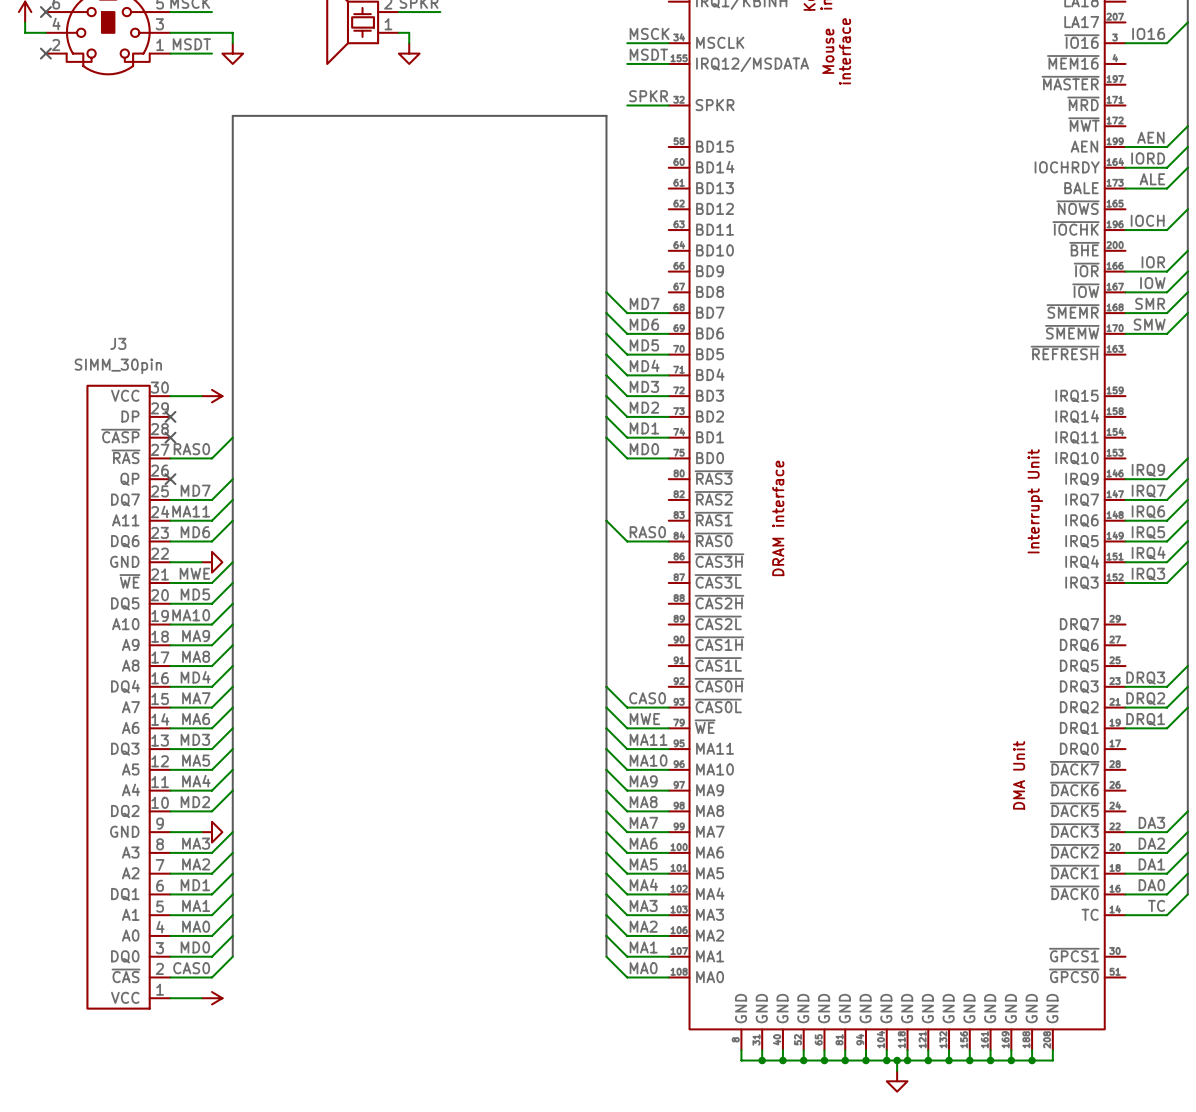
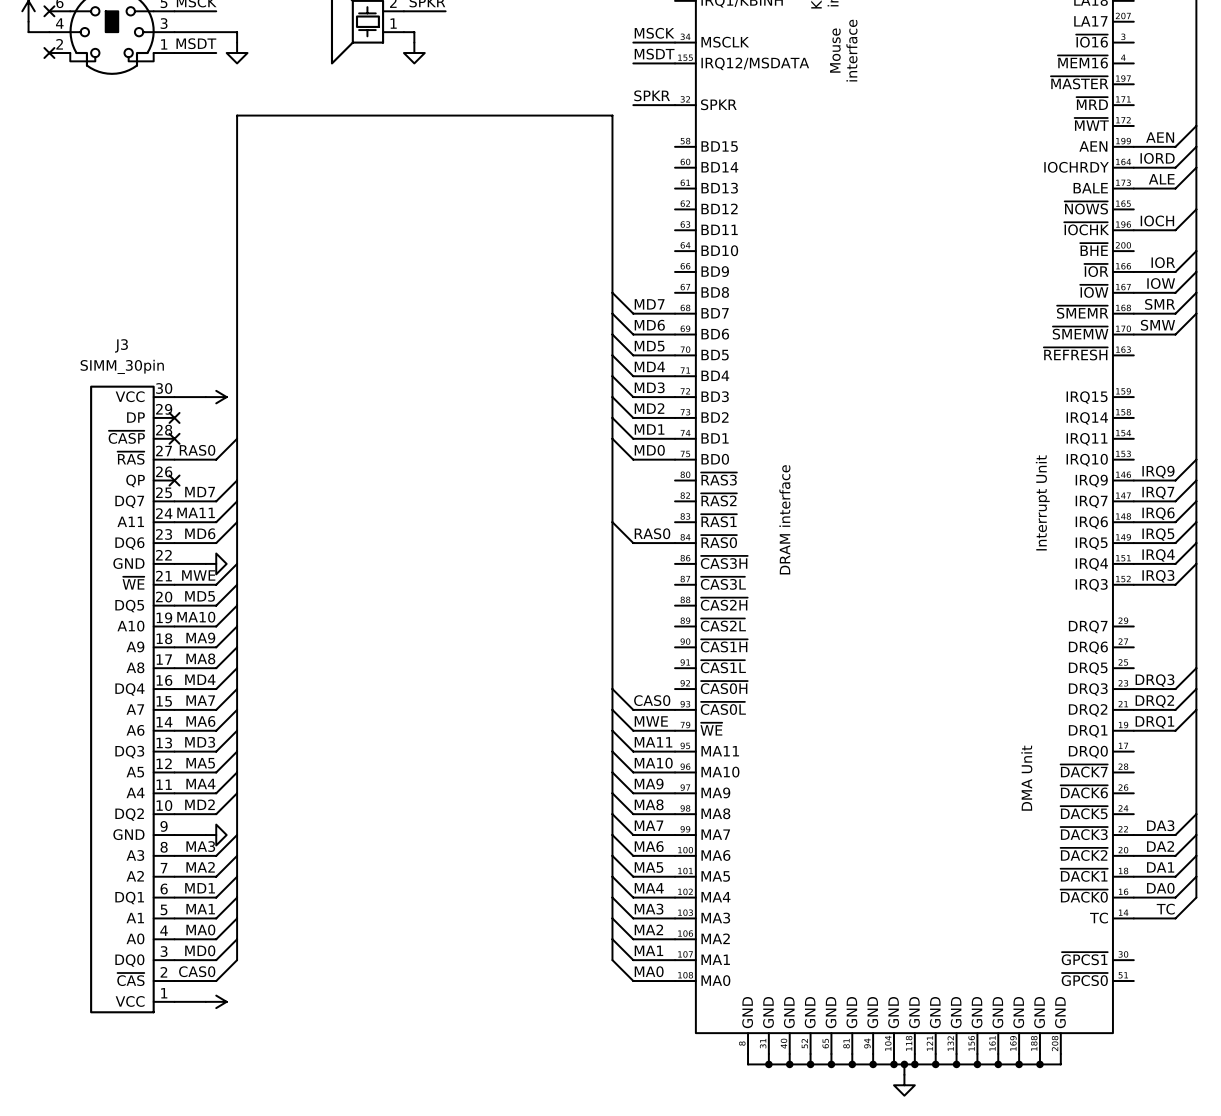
wire: (1187, 22) (1167, 43) (1125, 43) -> none
label: IO16 (1148, 33) -> none

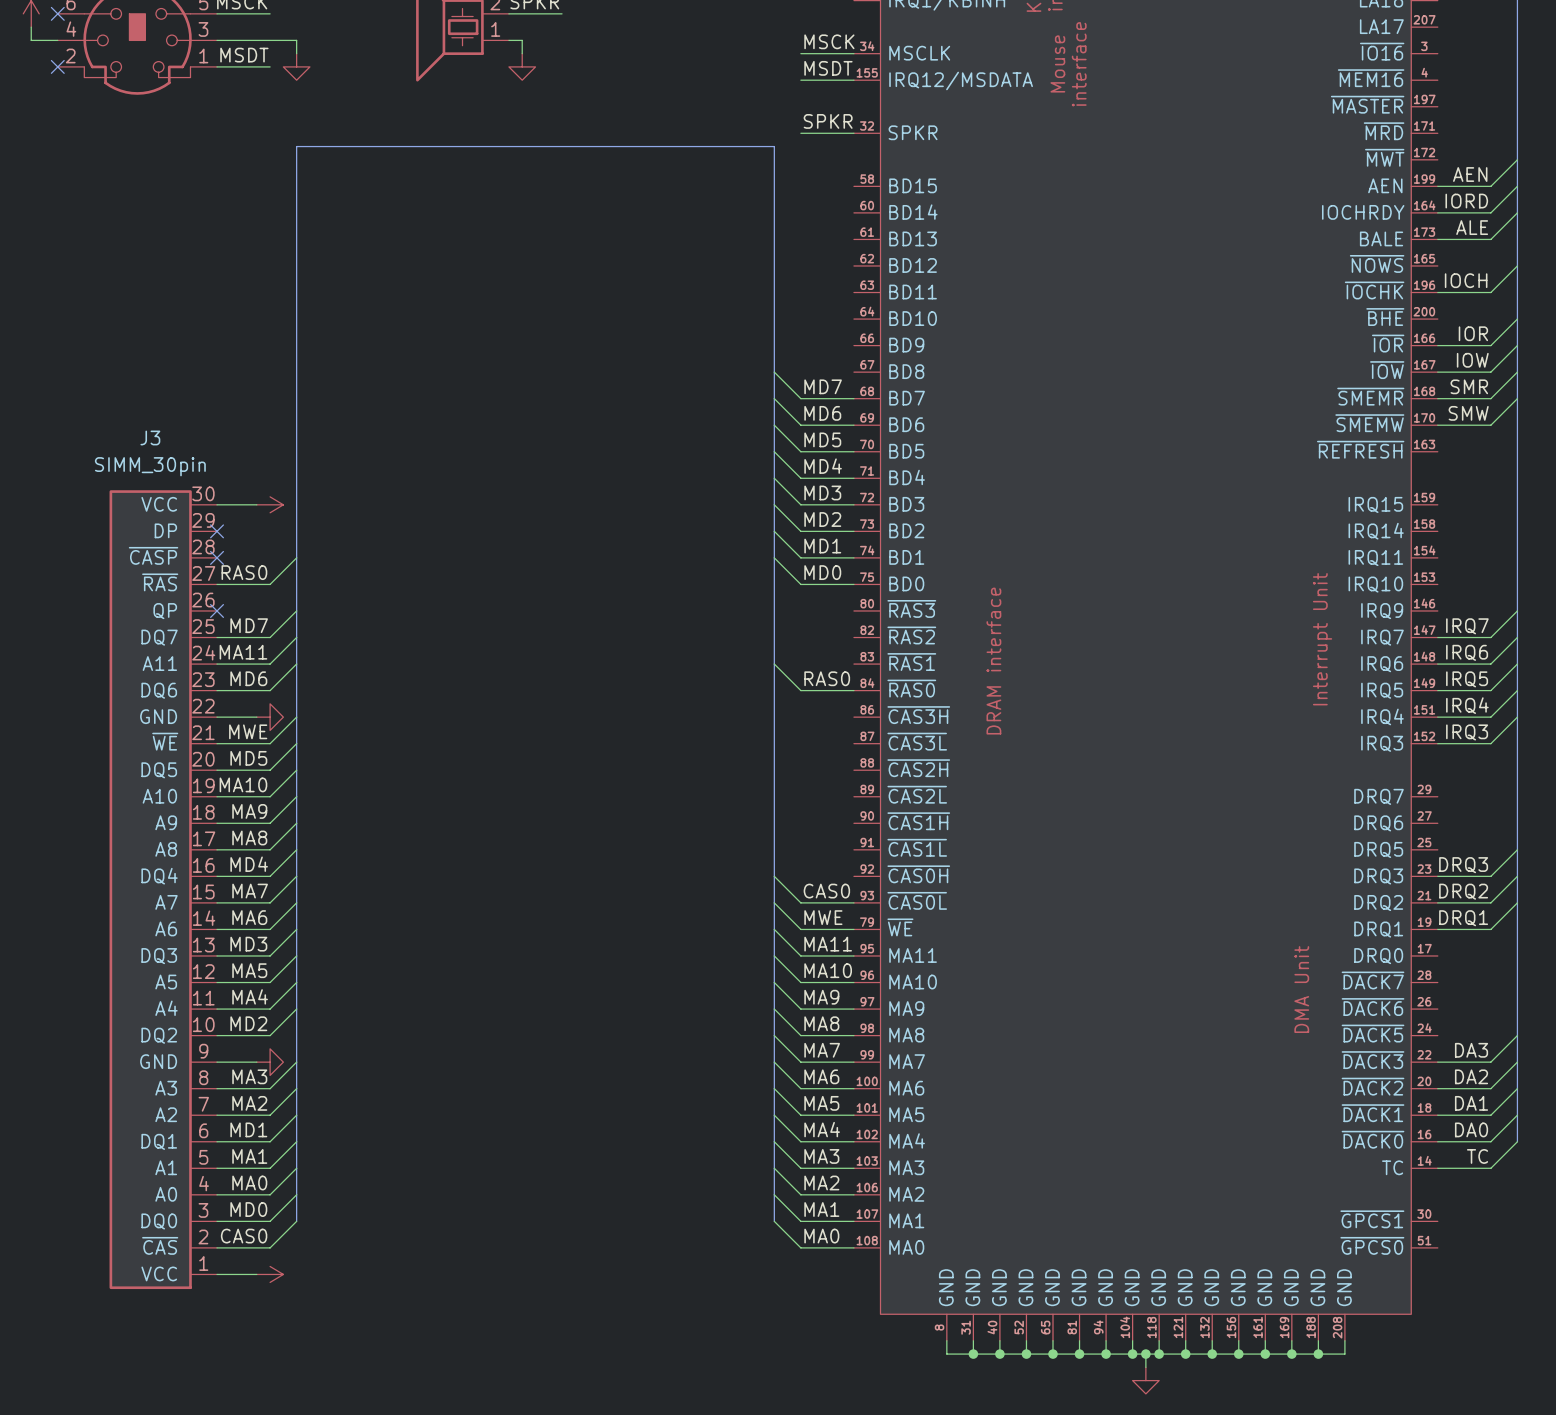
wire: (1196, 459) (1175, 480) (1133, 480) -> none
label: IRQ9 (1158, 472) -> none

